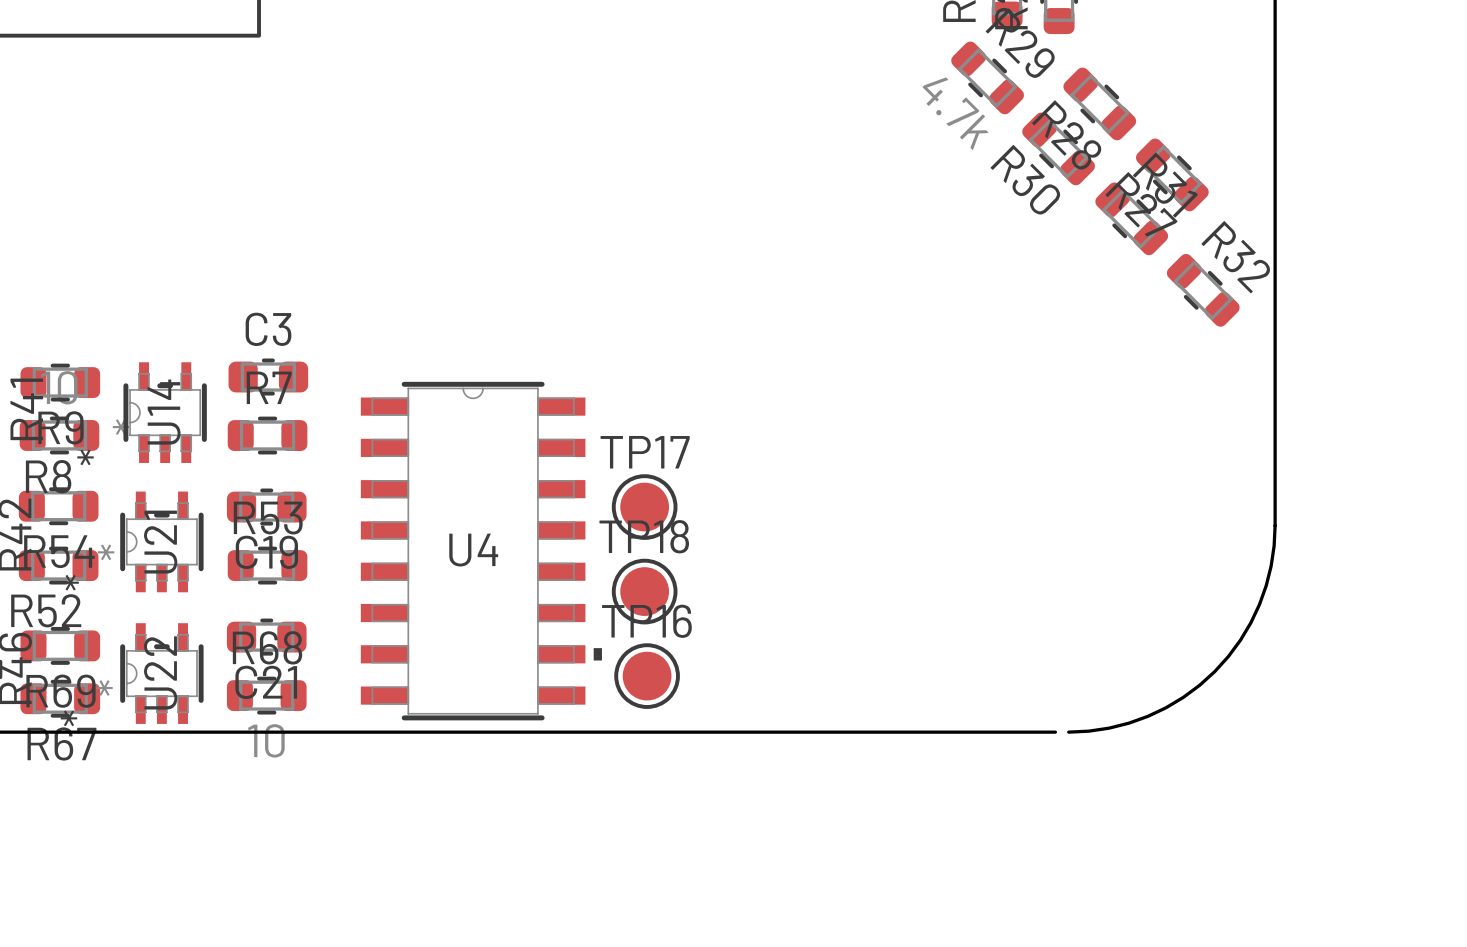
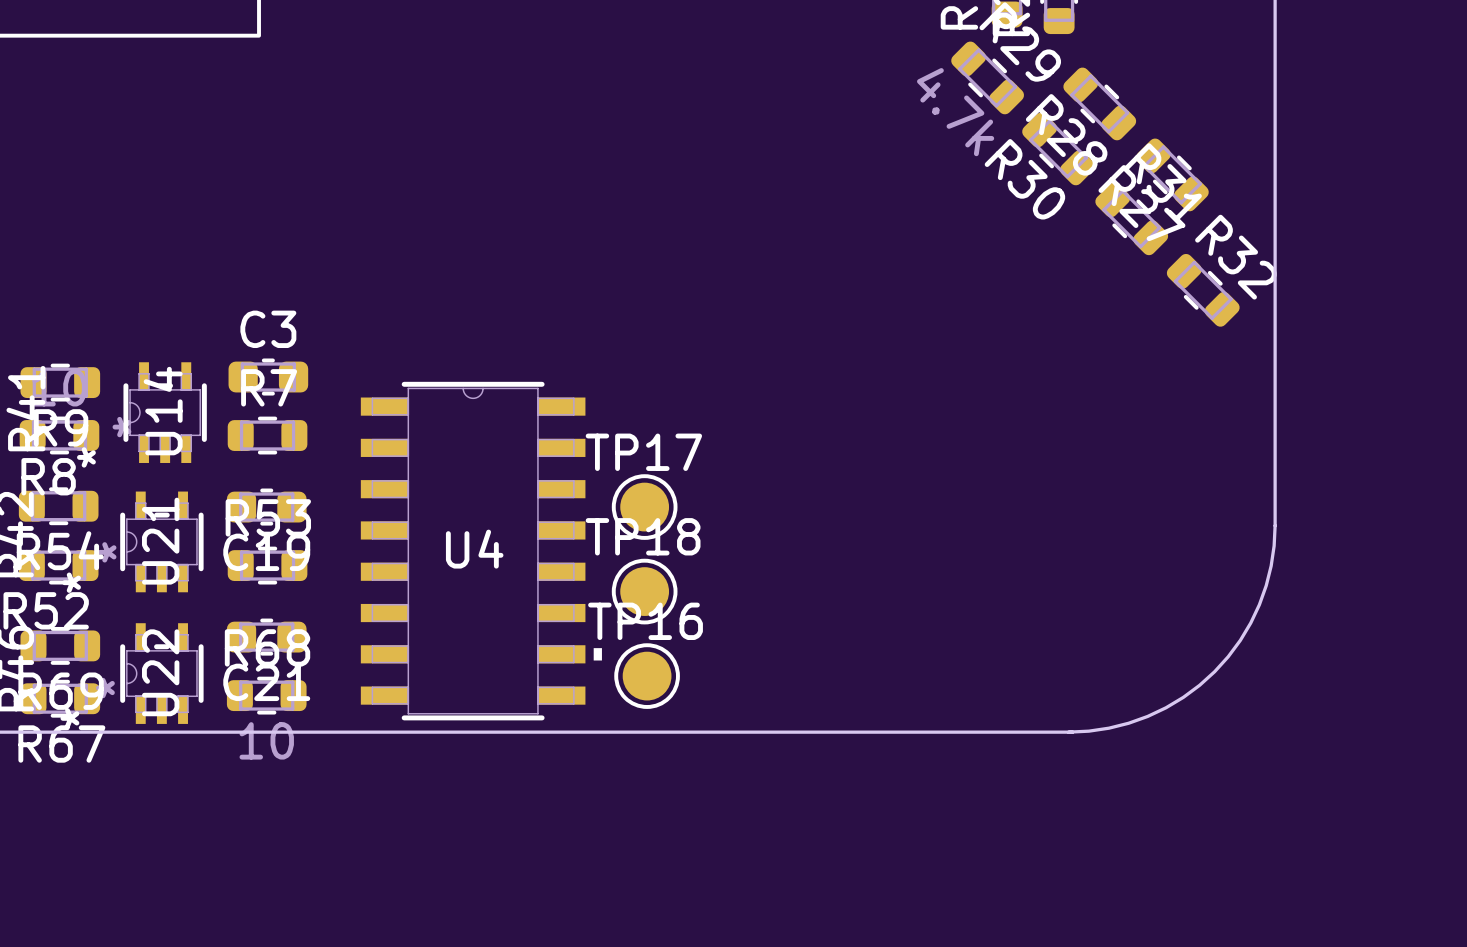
board edge: none -> (1055, 732) (1072, 732)

